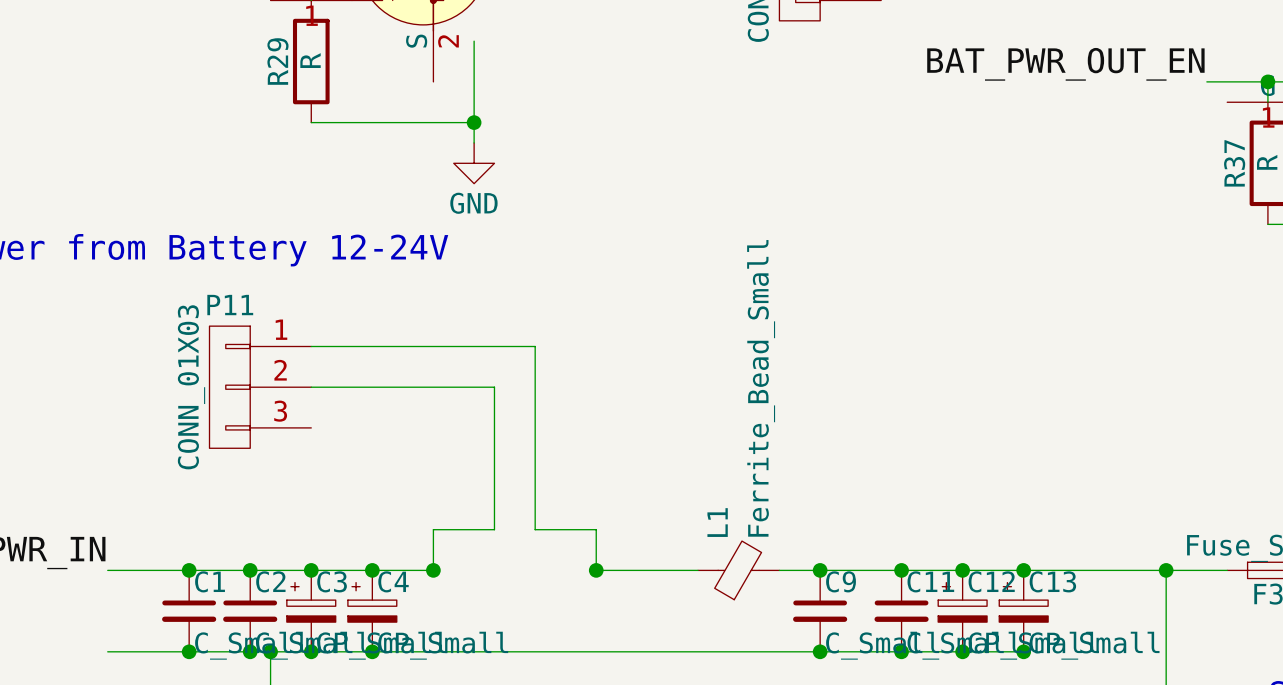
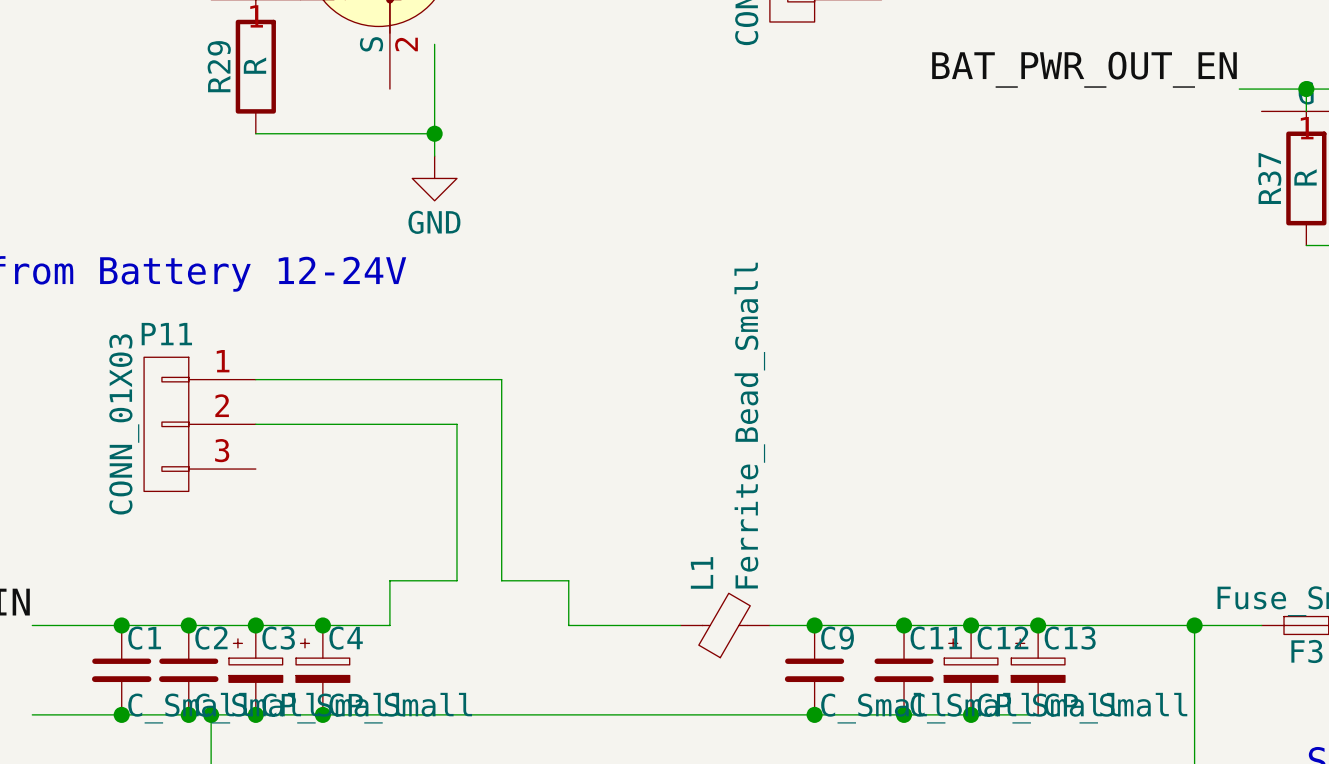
junction: (433, 570) -> none
junction: (596, 570) -> none
junction: (1023, 651) -> none

